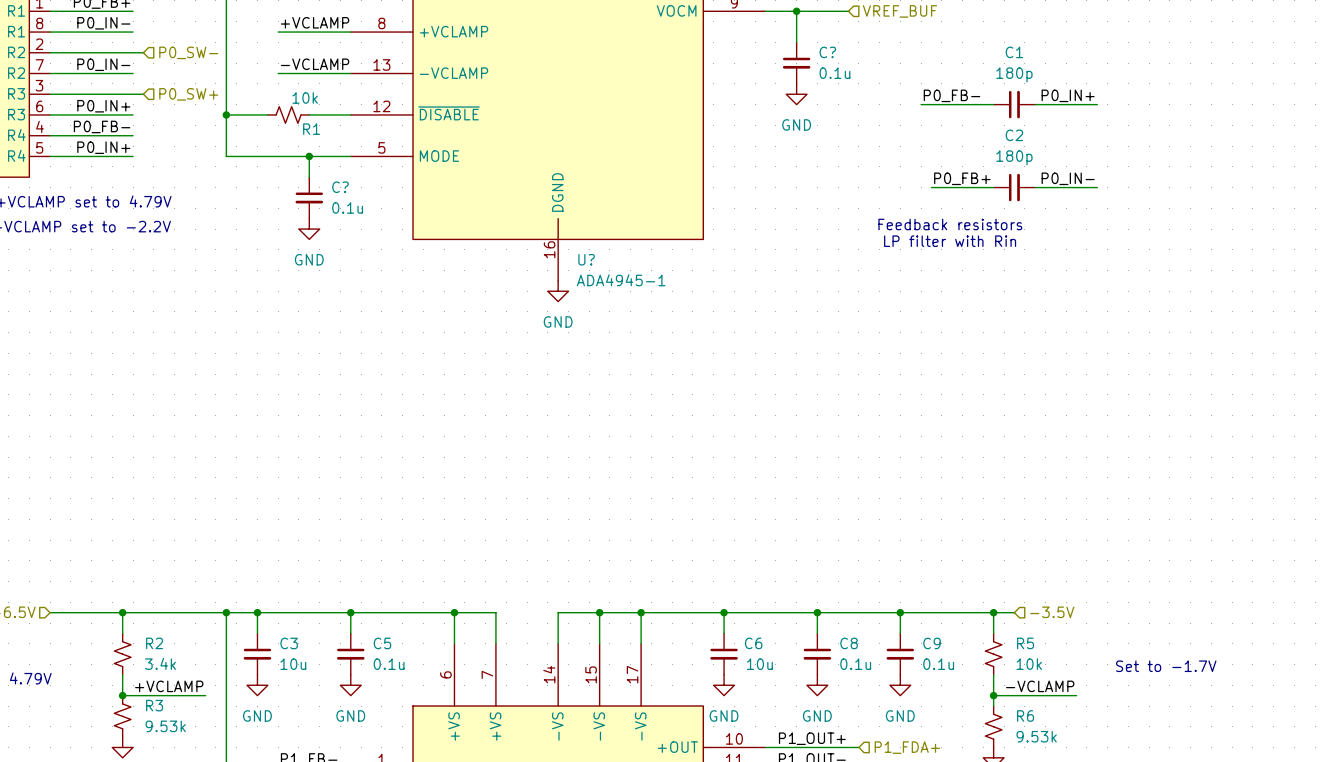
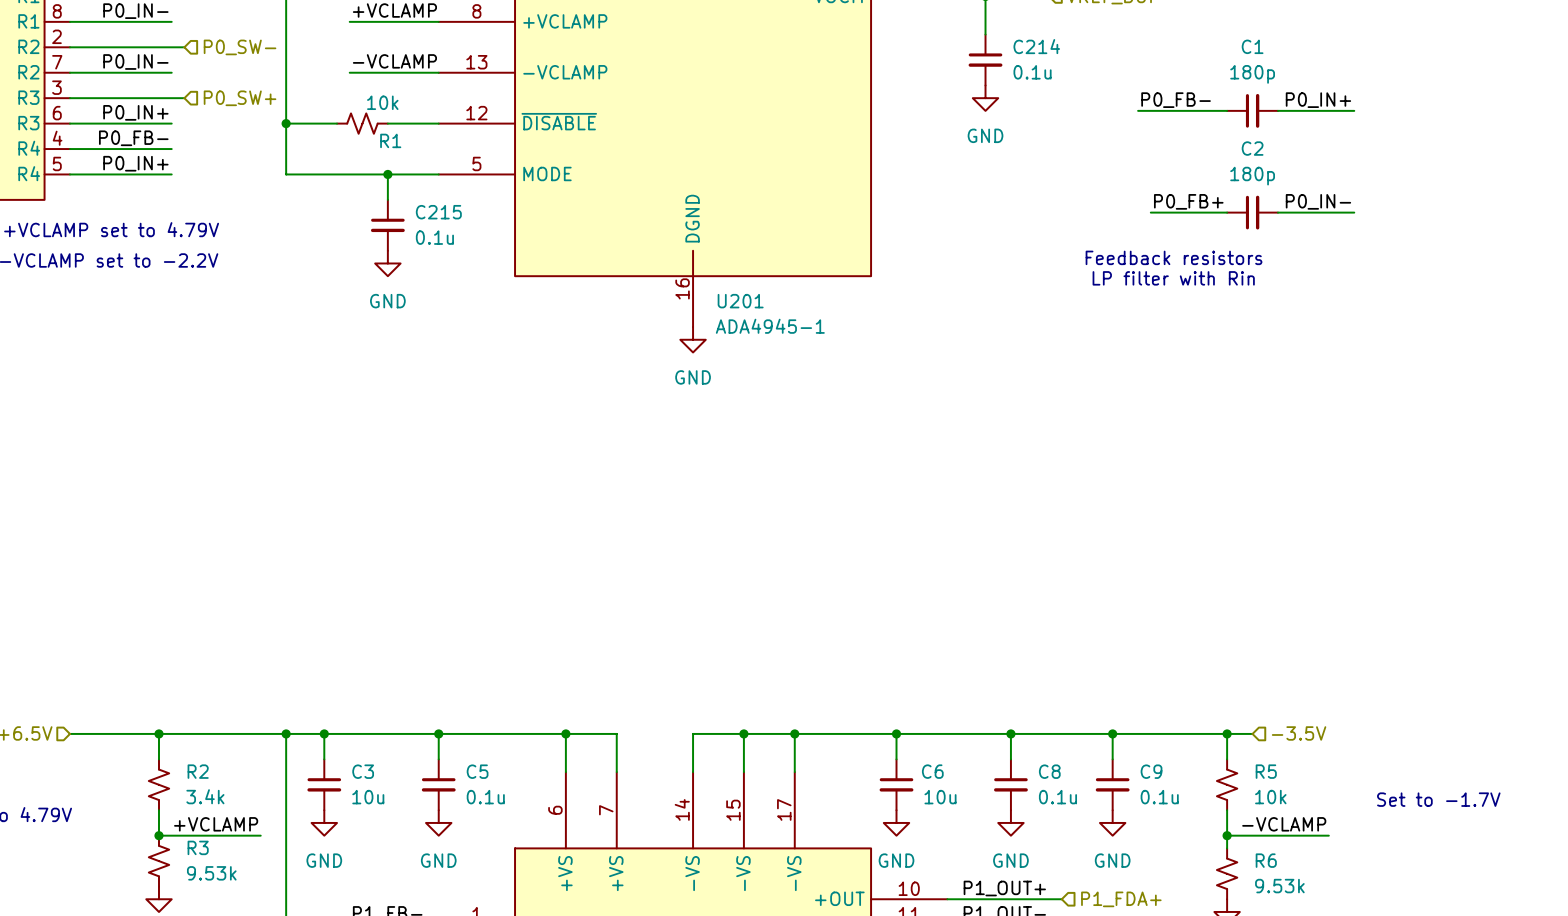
C? name: C? (827, 52) -> C214 (1036, 46)
C? name: C? (340, 187) -> C215 (438, 212)
U? name: U? (586, 259) -> U201 (740, 301)

